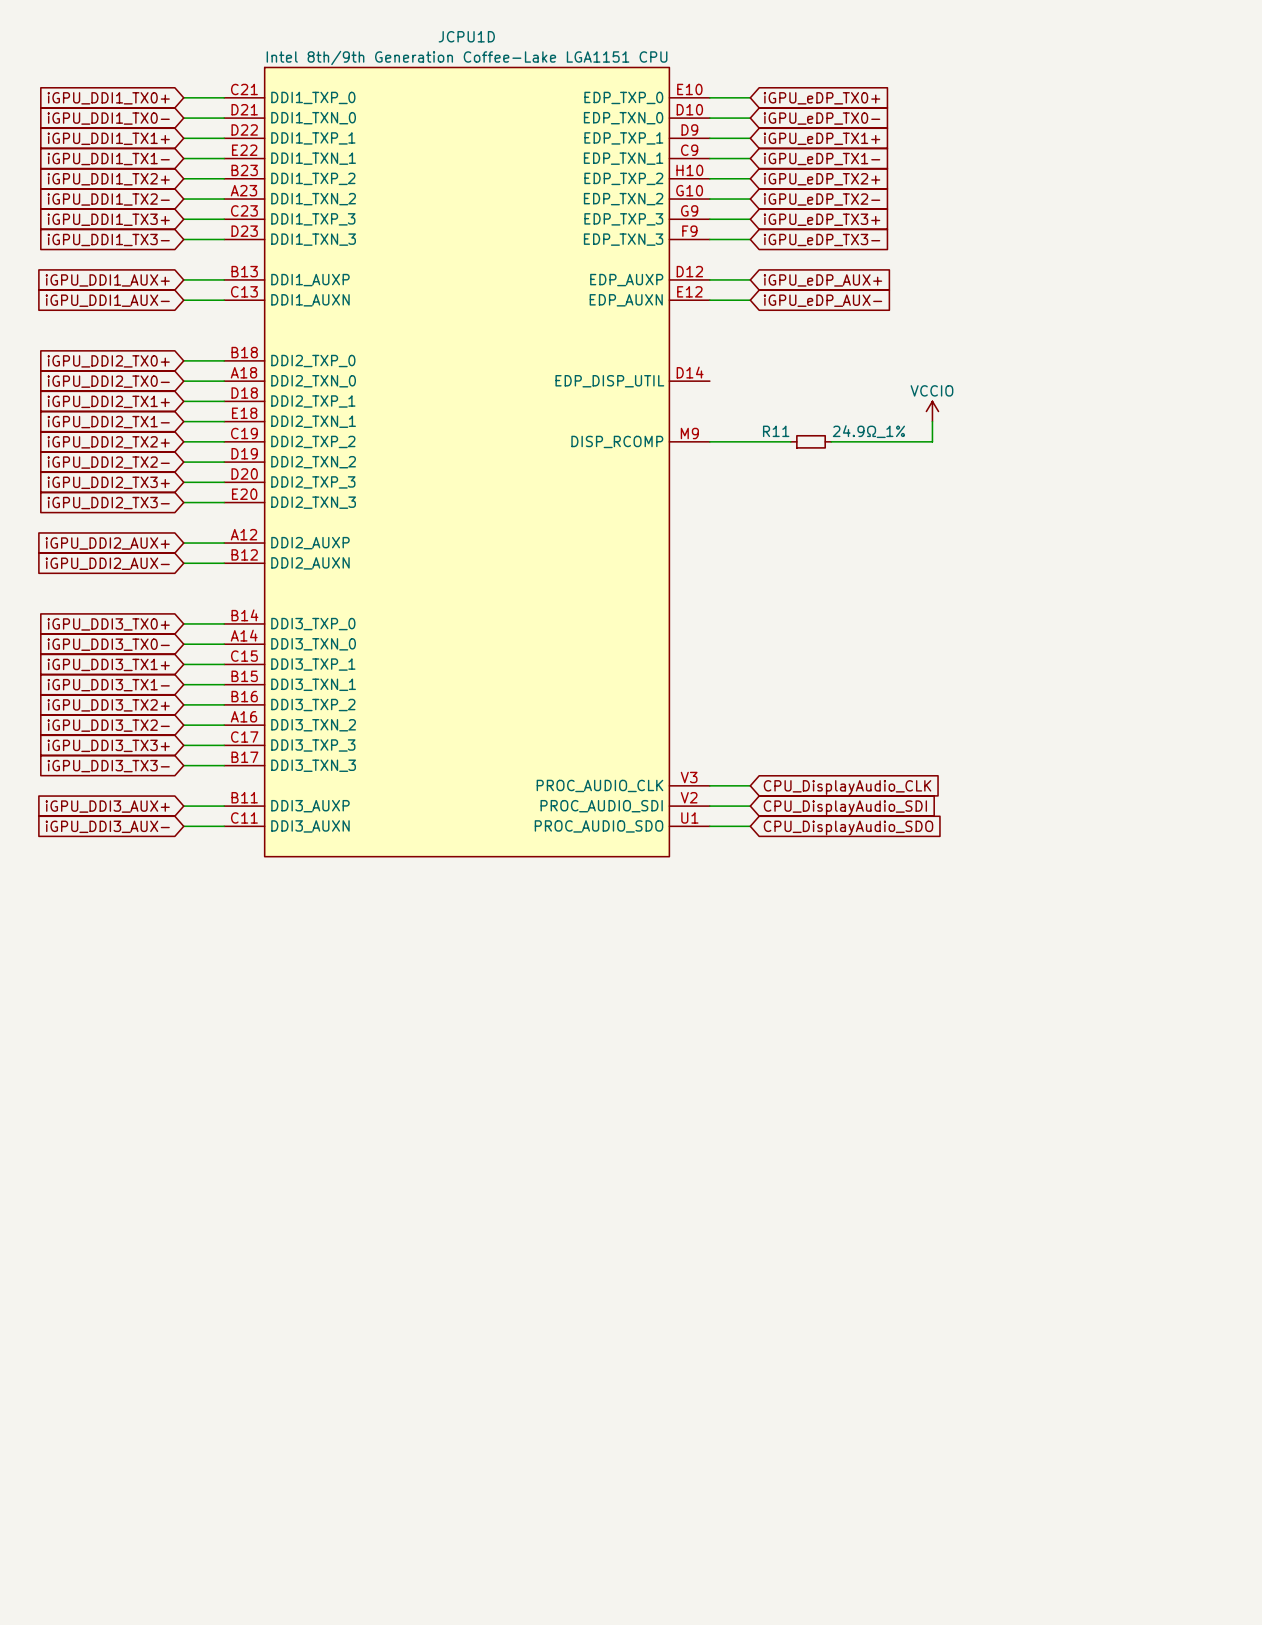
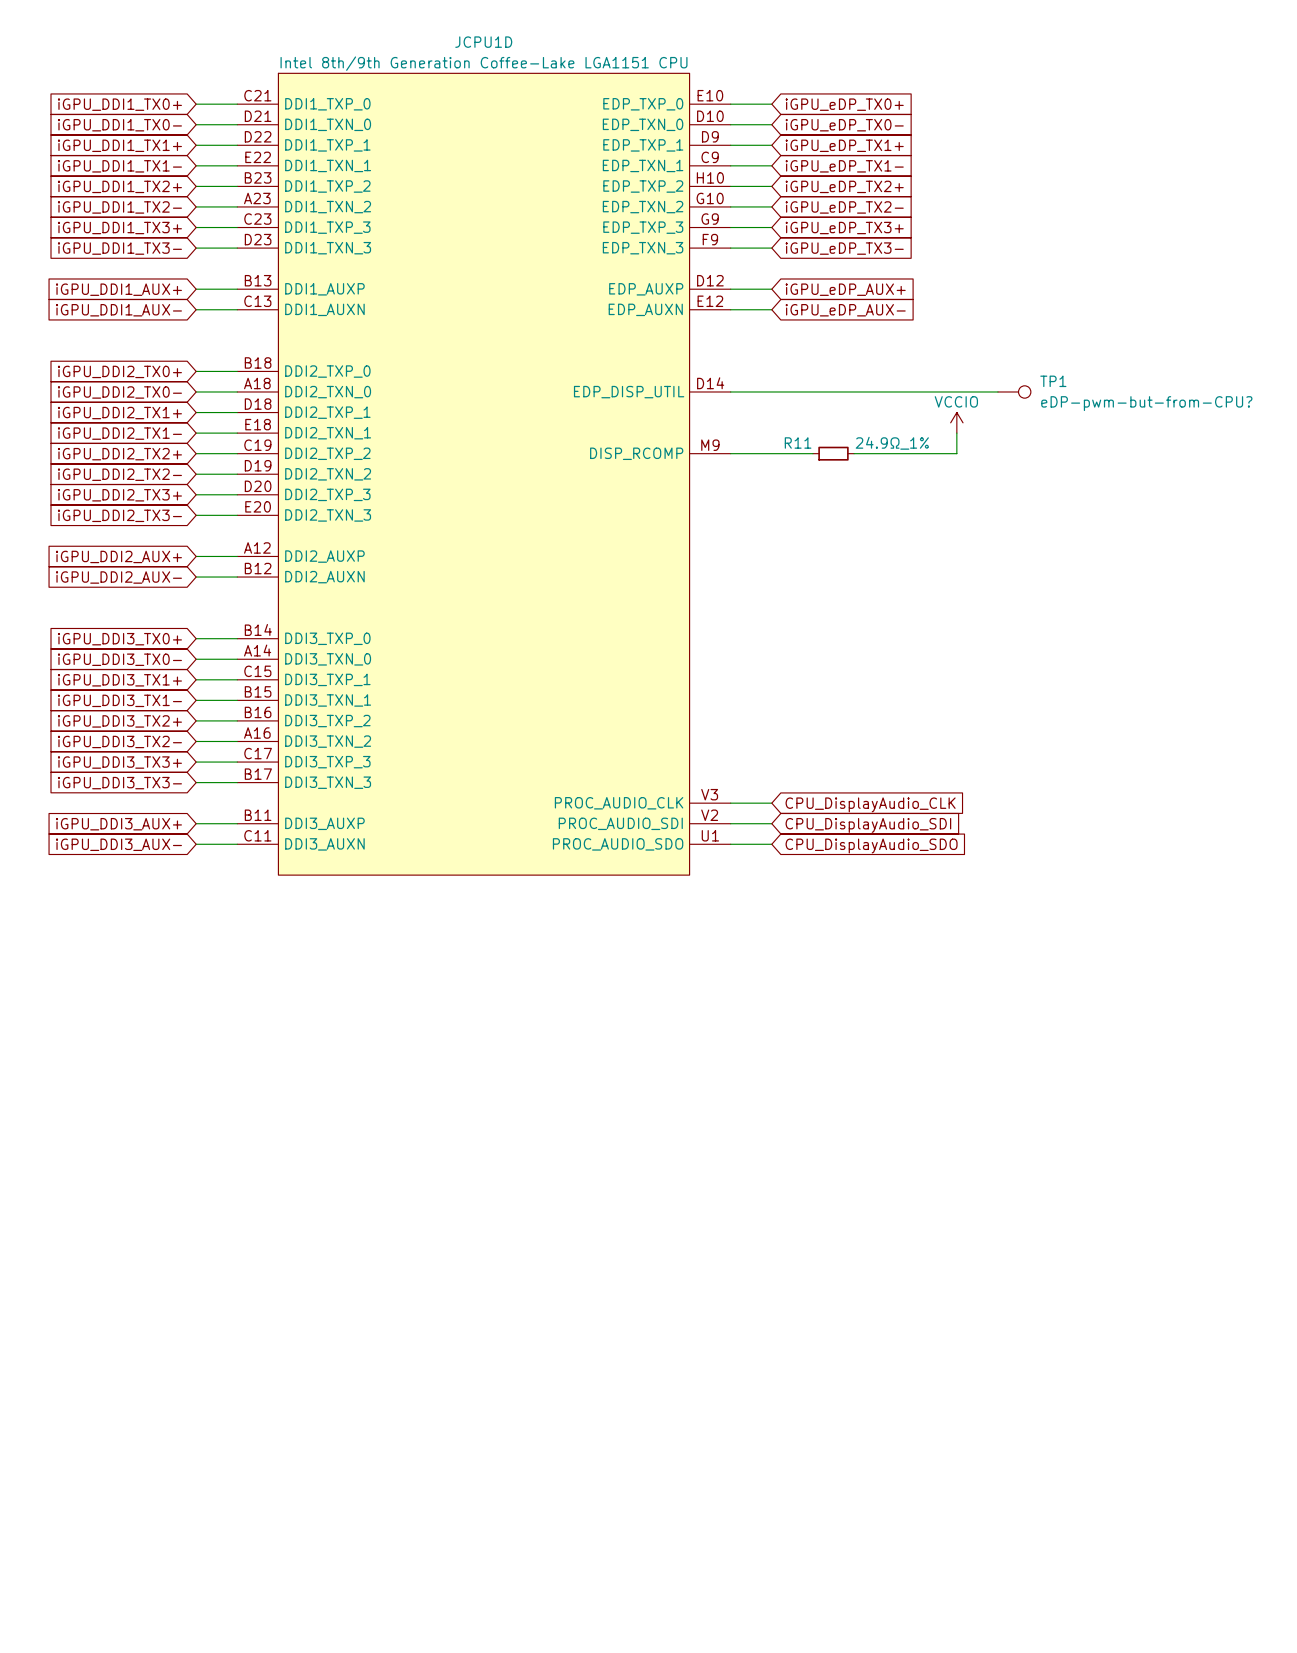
wire: none -> (730, 391) (997, 391)
TP1: none -> eDP-pwm-but-from-CPU? (1014, 391)

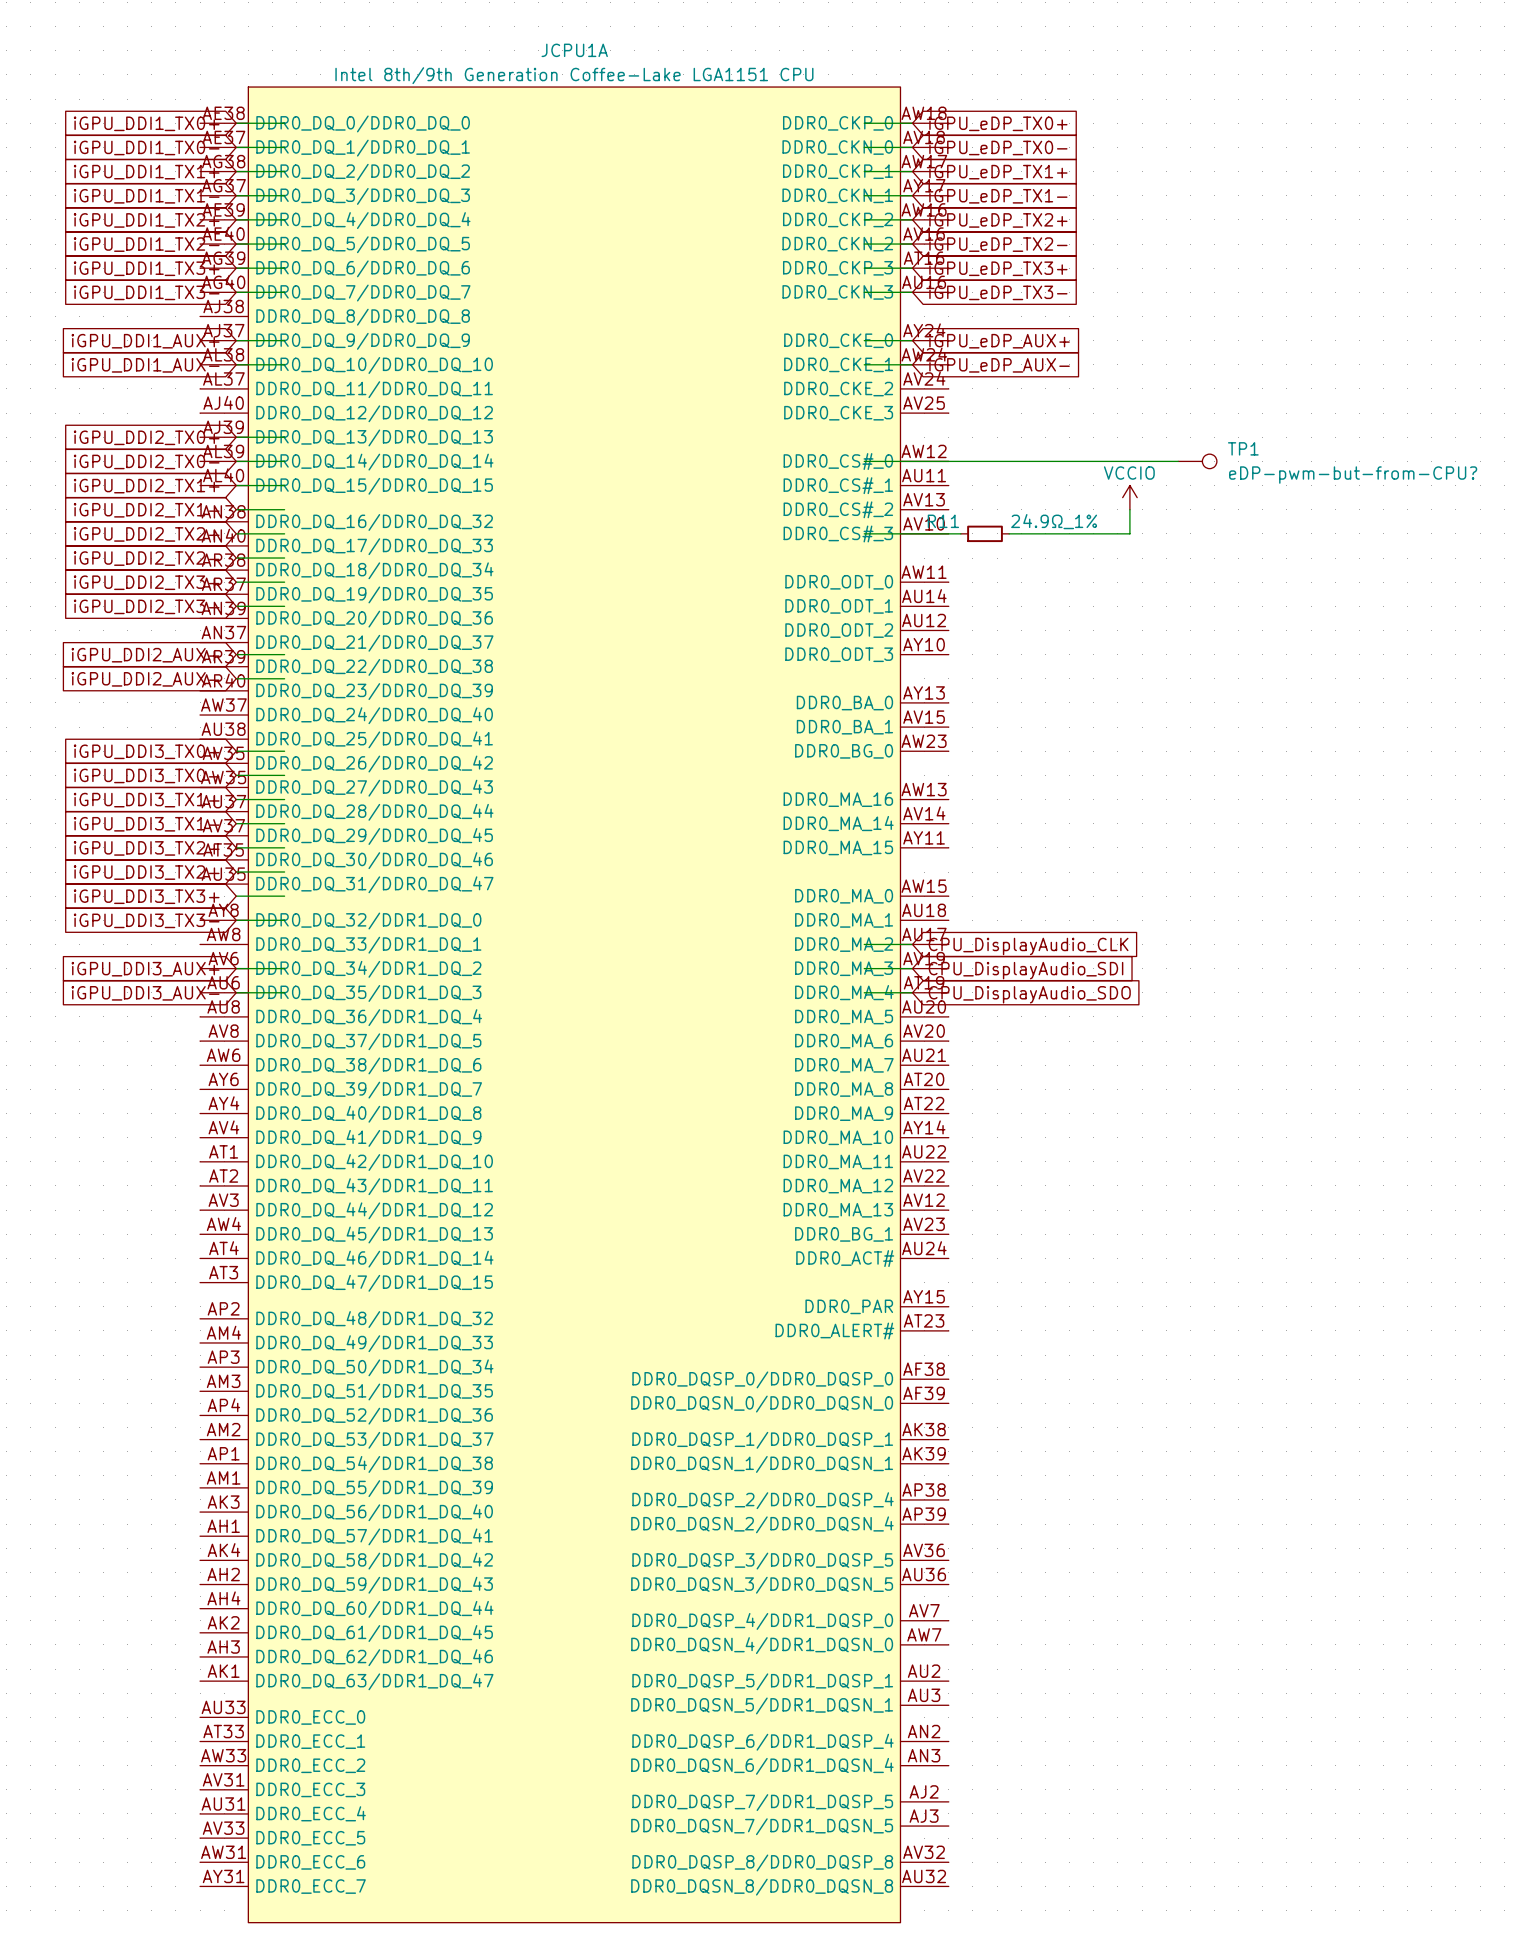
JCPU1D: Intel 8th/9th Generation Coffee-Lake LGA1151 CPU (484, 474) -> none
JCPU1A: none -> Intel 8th/9th Generation Coffee-Lake LGA1151 CPU (574, 1004)

